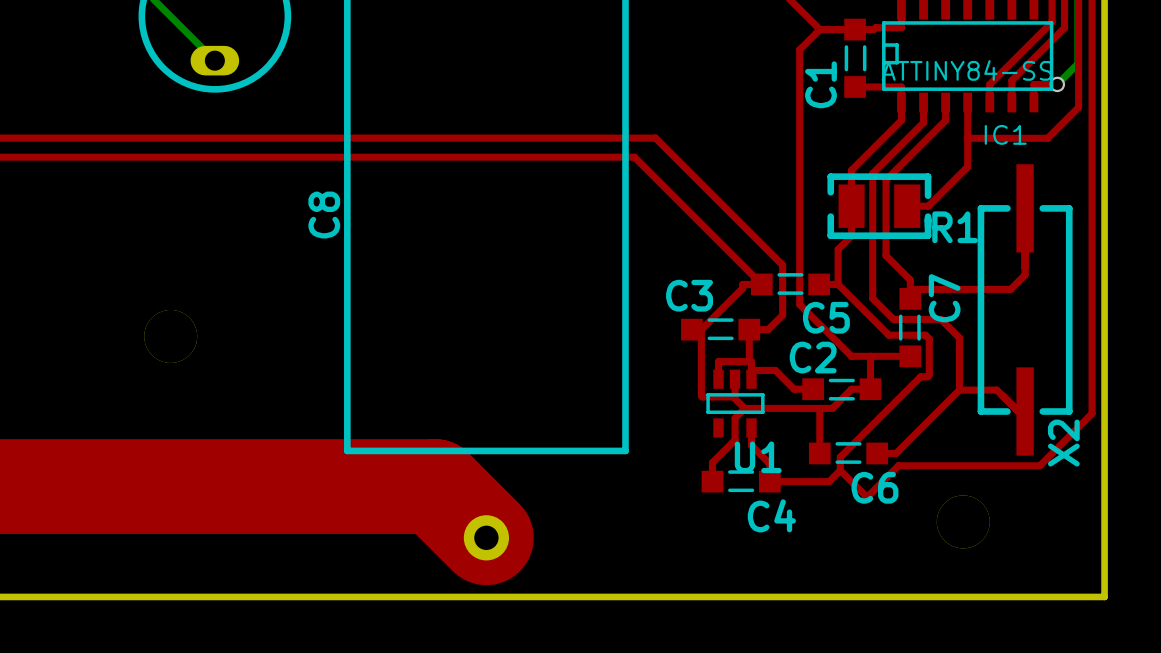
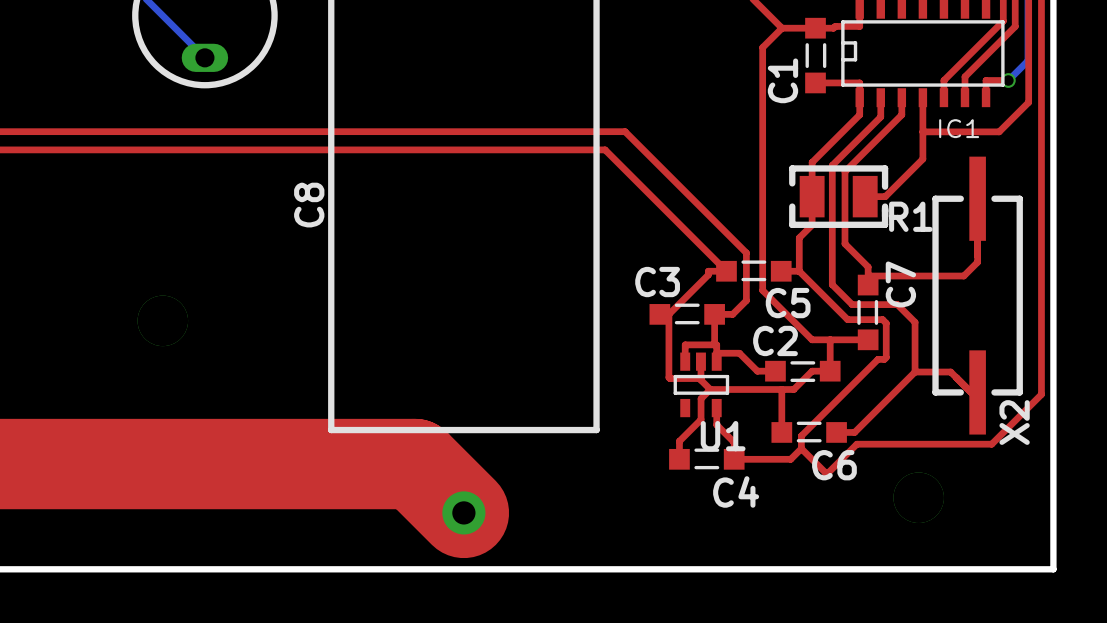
IC1 value: ATTINY84-SS (966, 70) -> none

